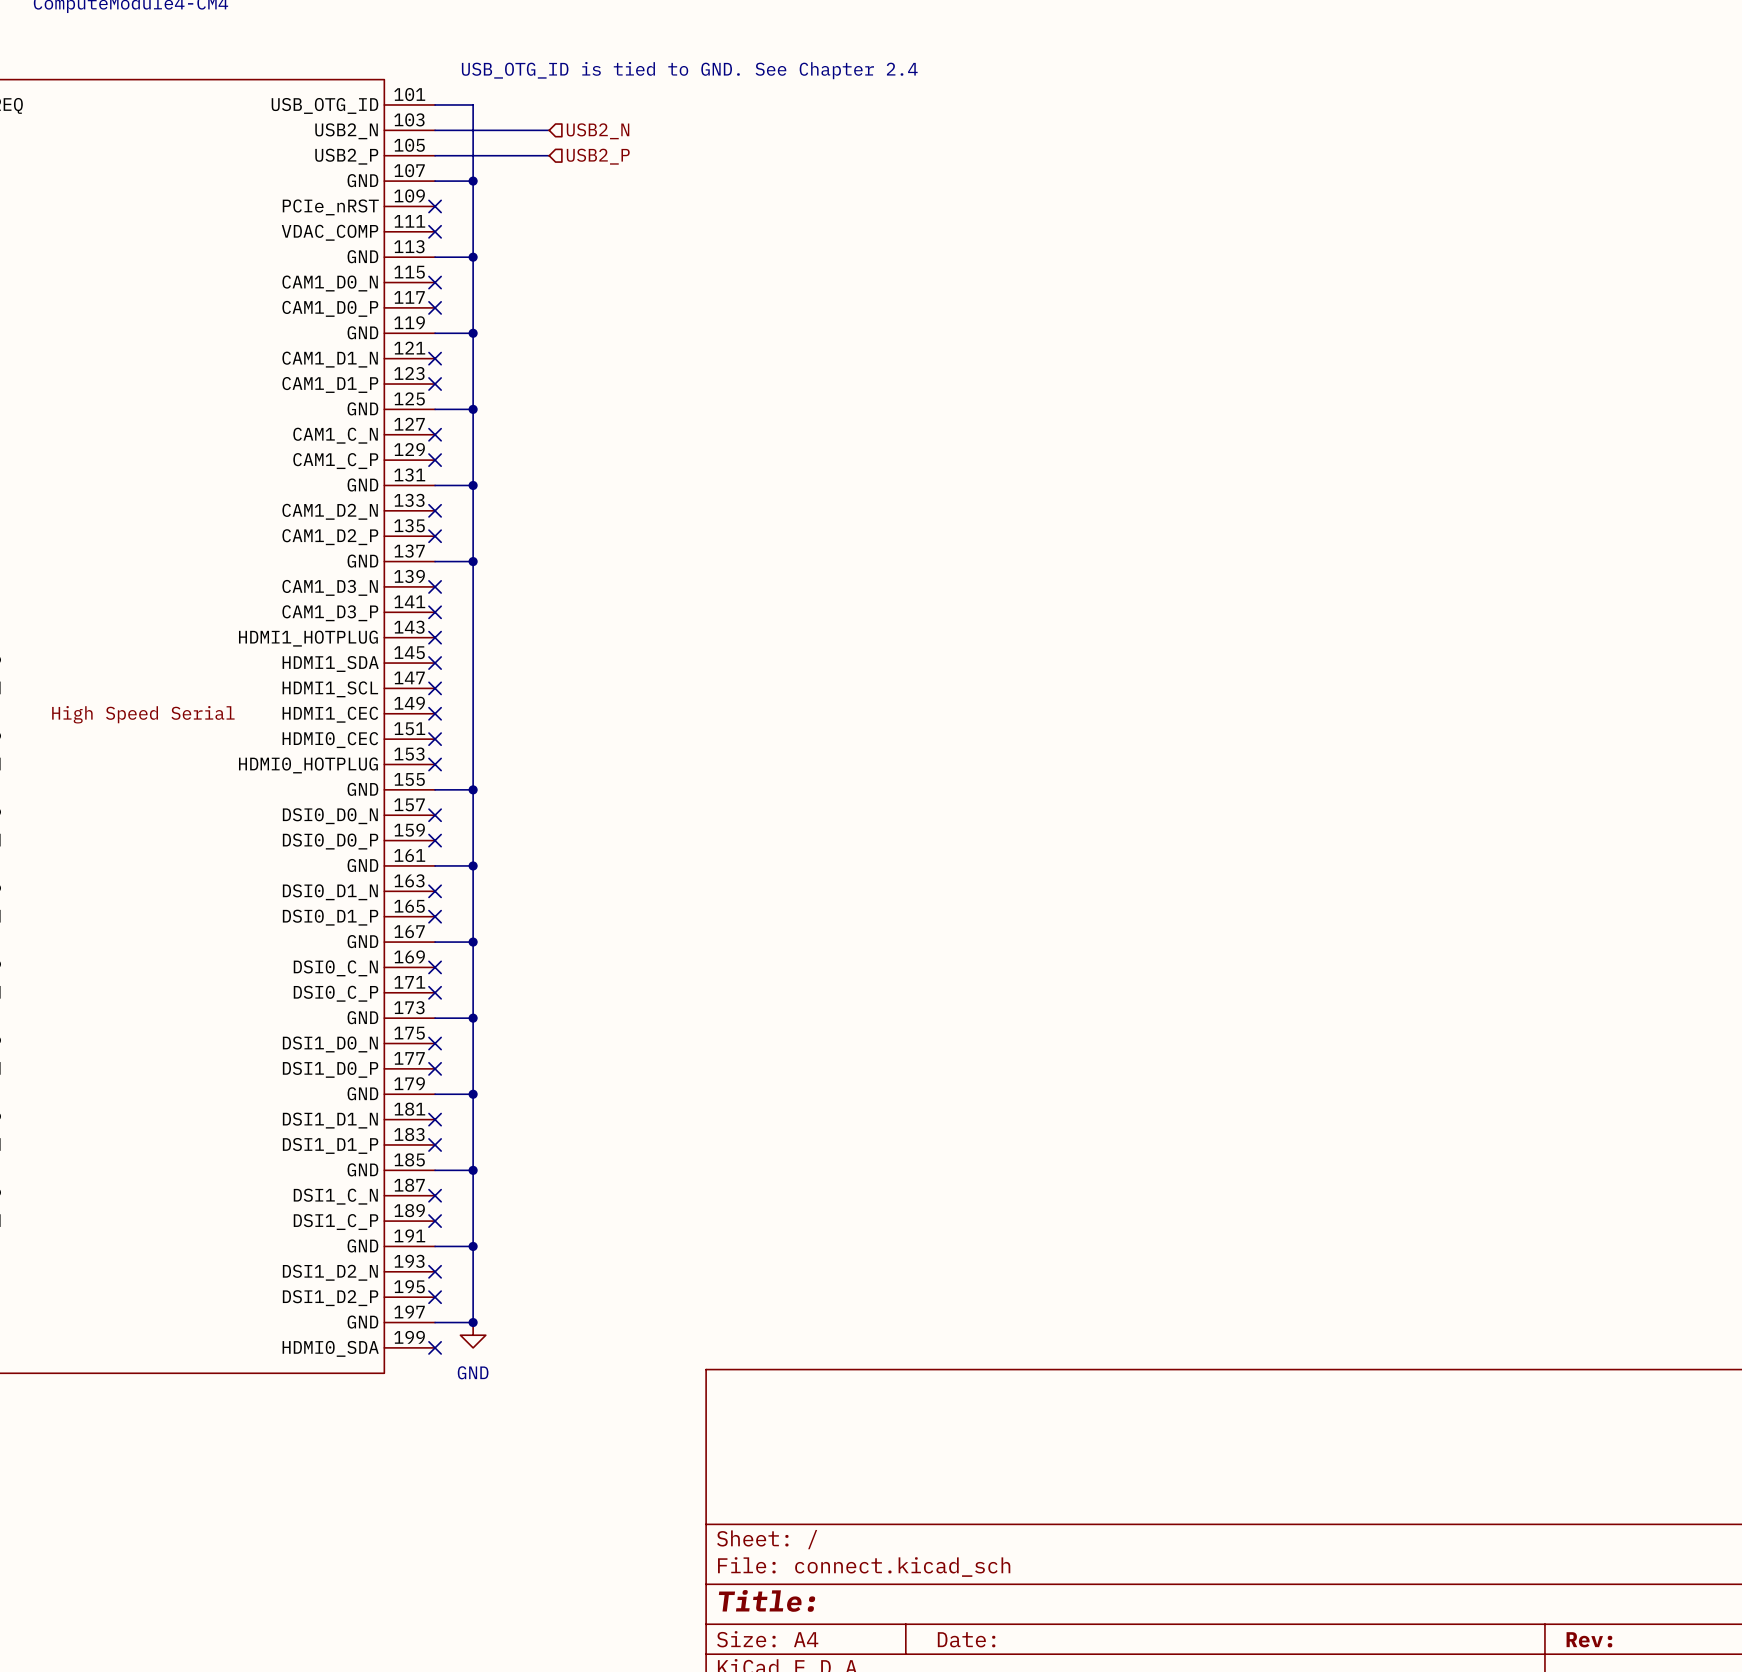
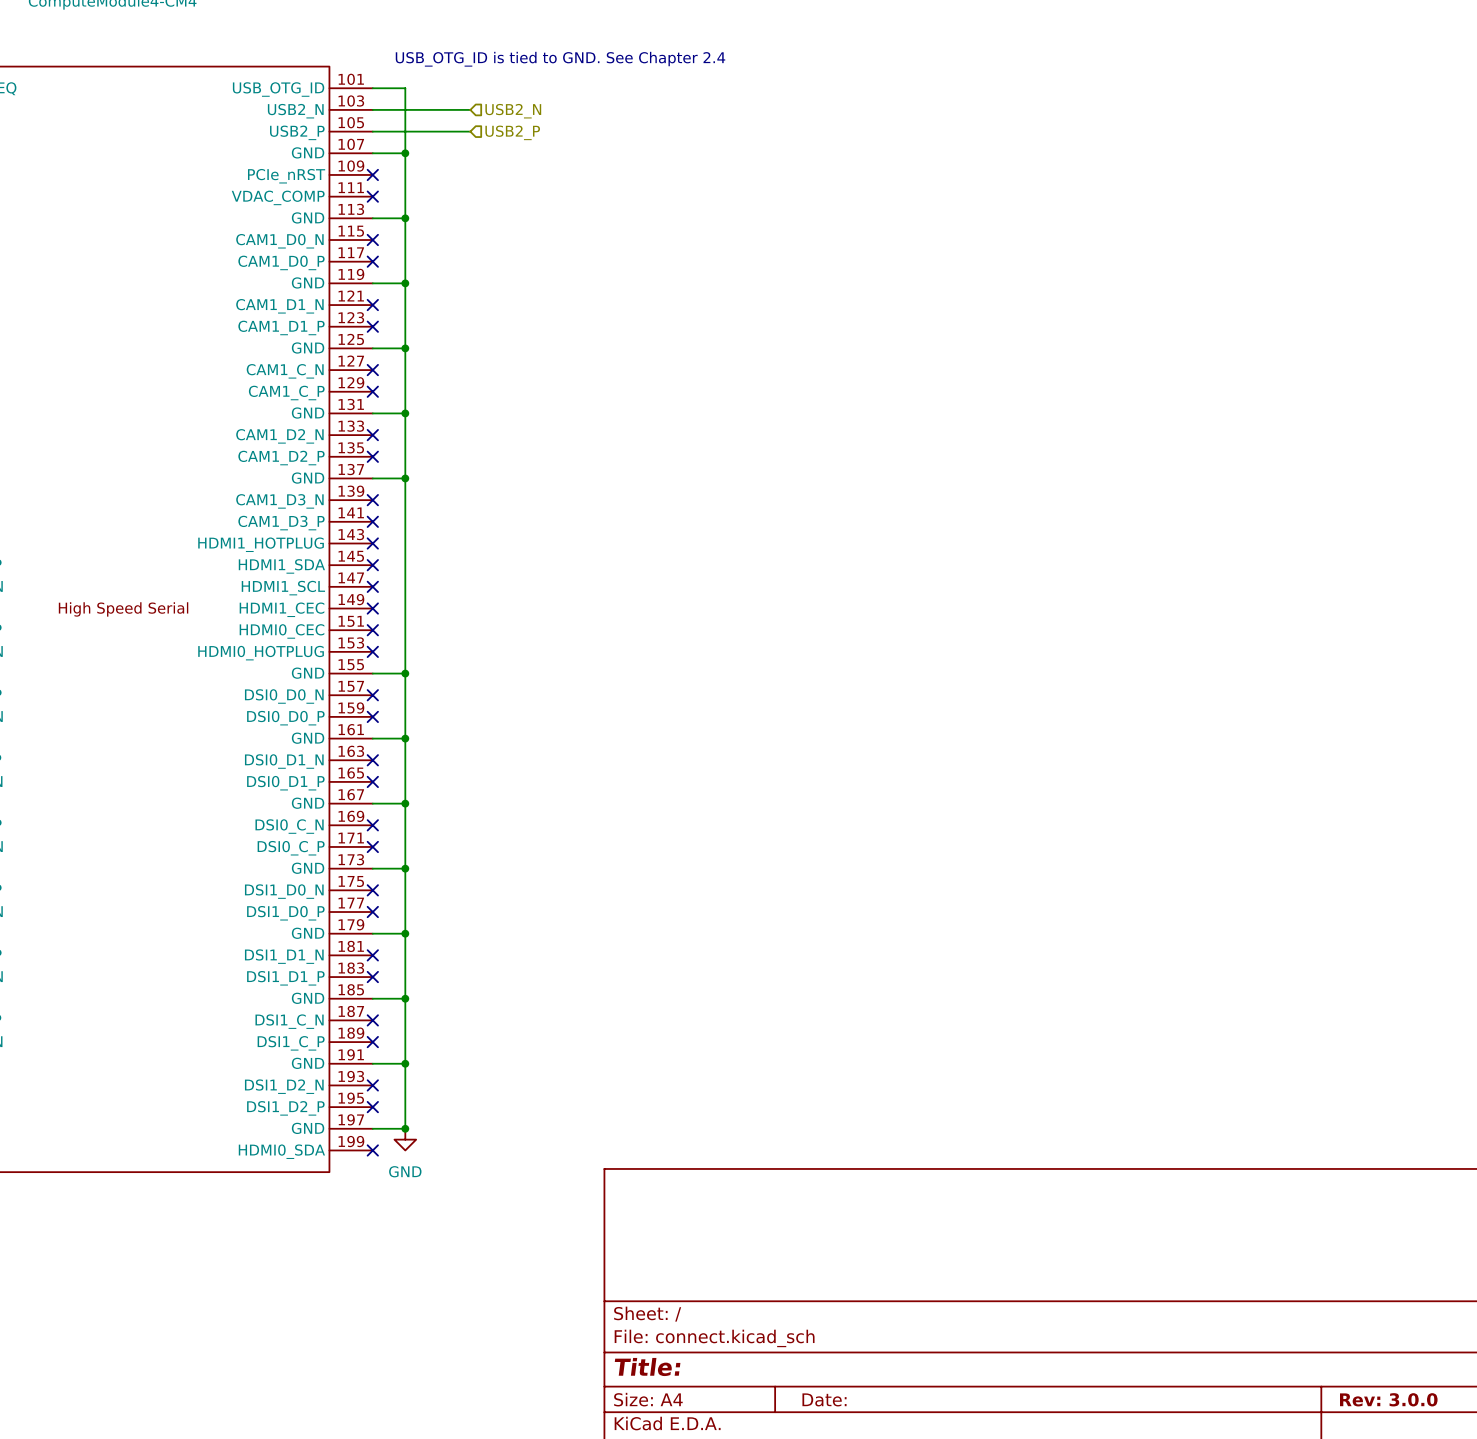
title block: Rev: (1589, 1639) -> Rev: 3.0.0 (1388, 1399)

